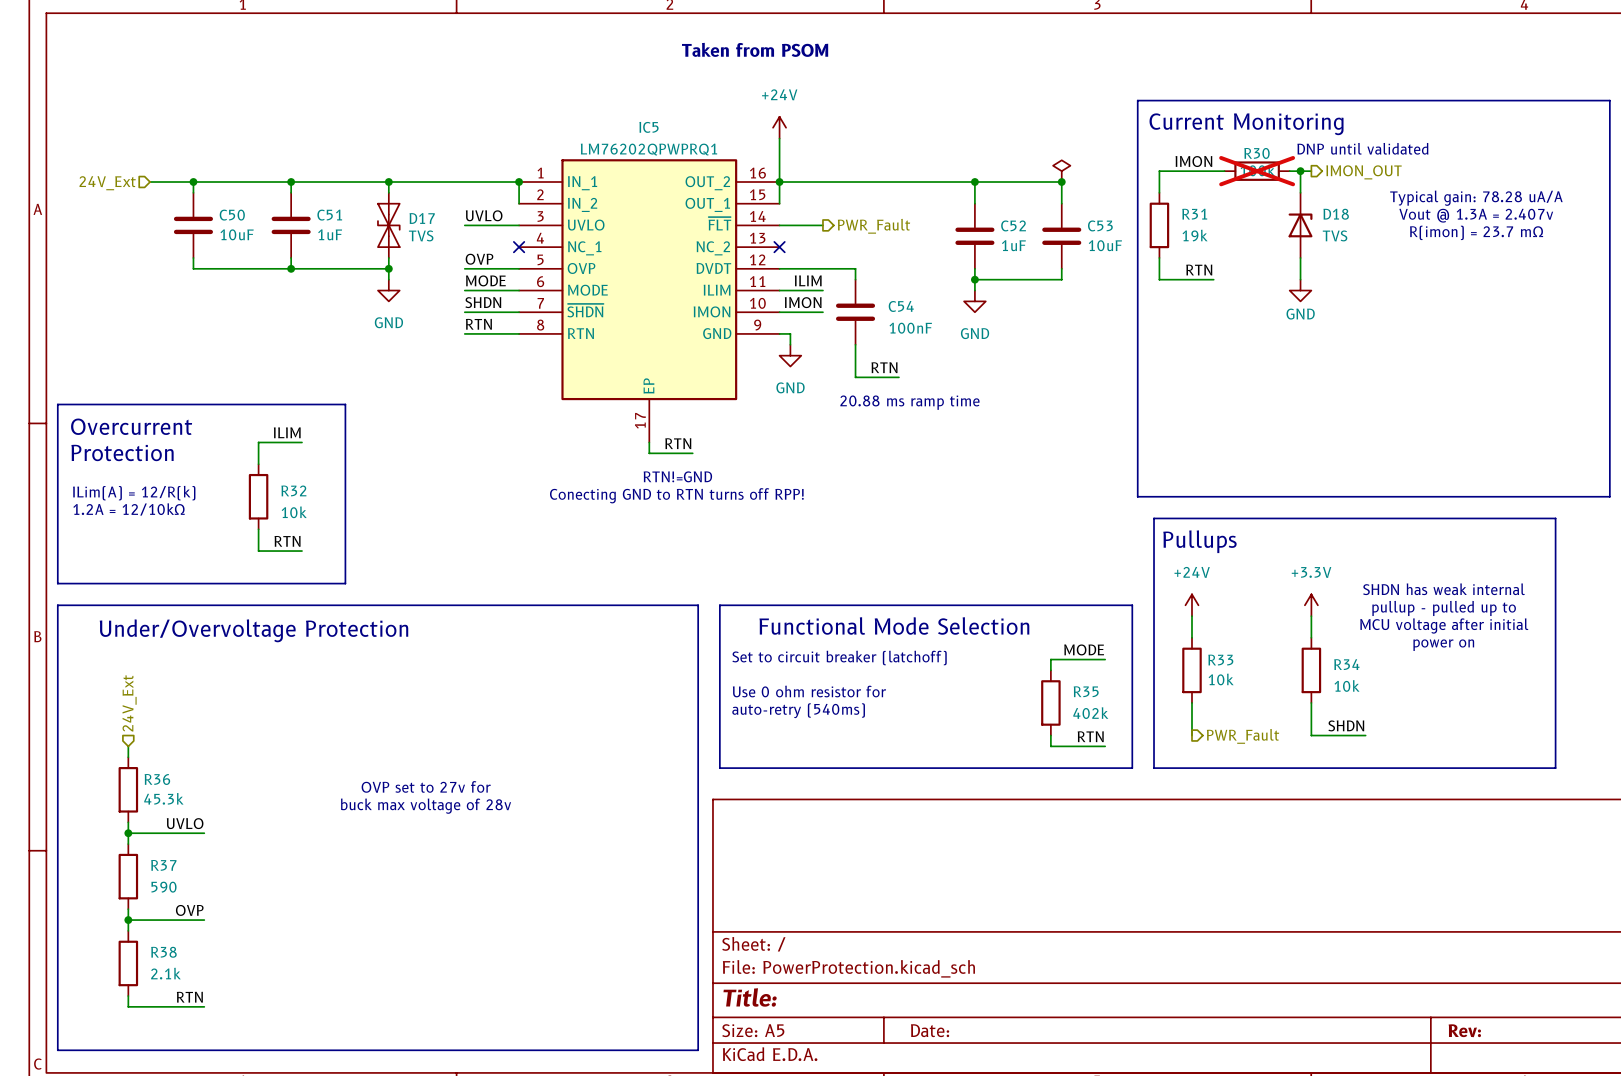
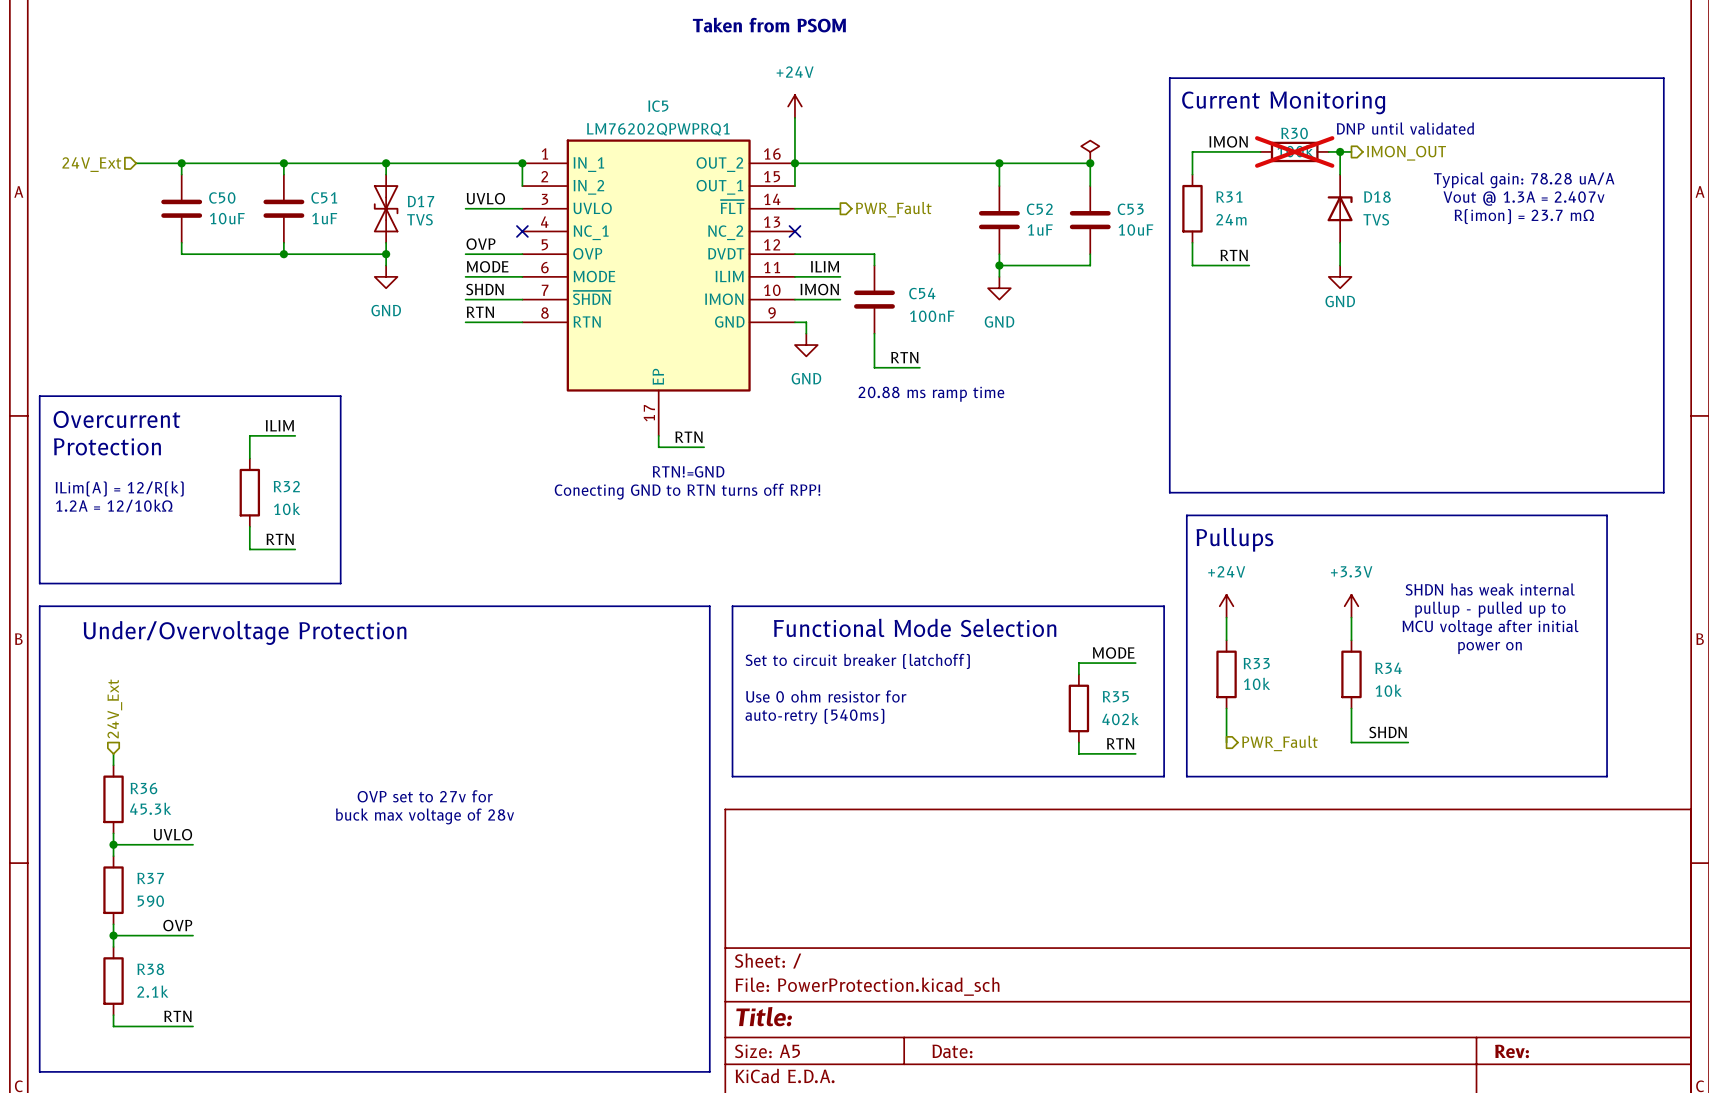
R31 value: 19k (1195, 235) -> 24m (1231, 219)

